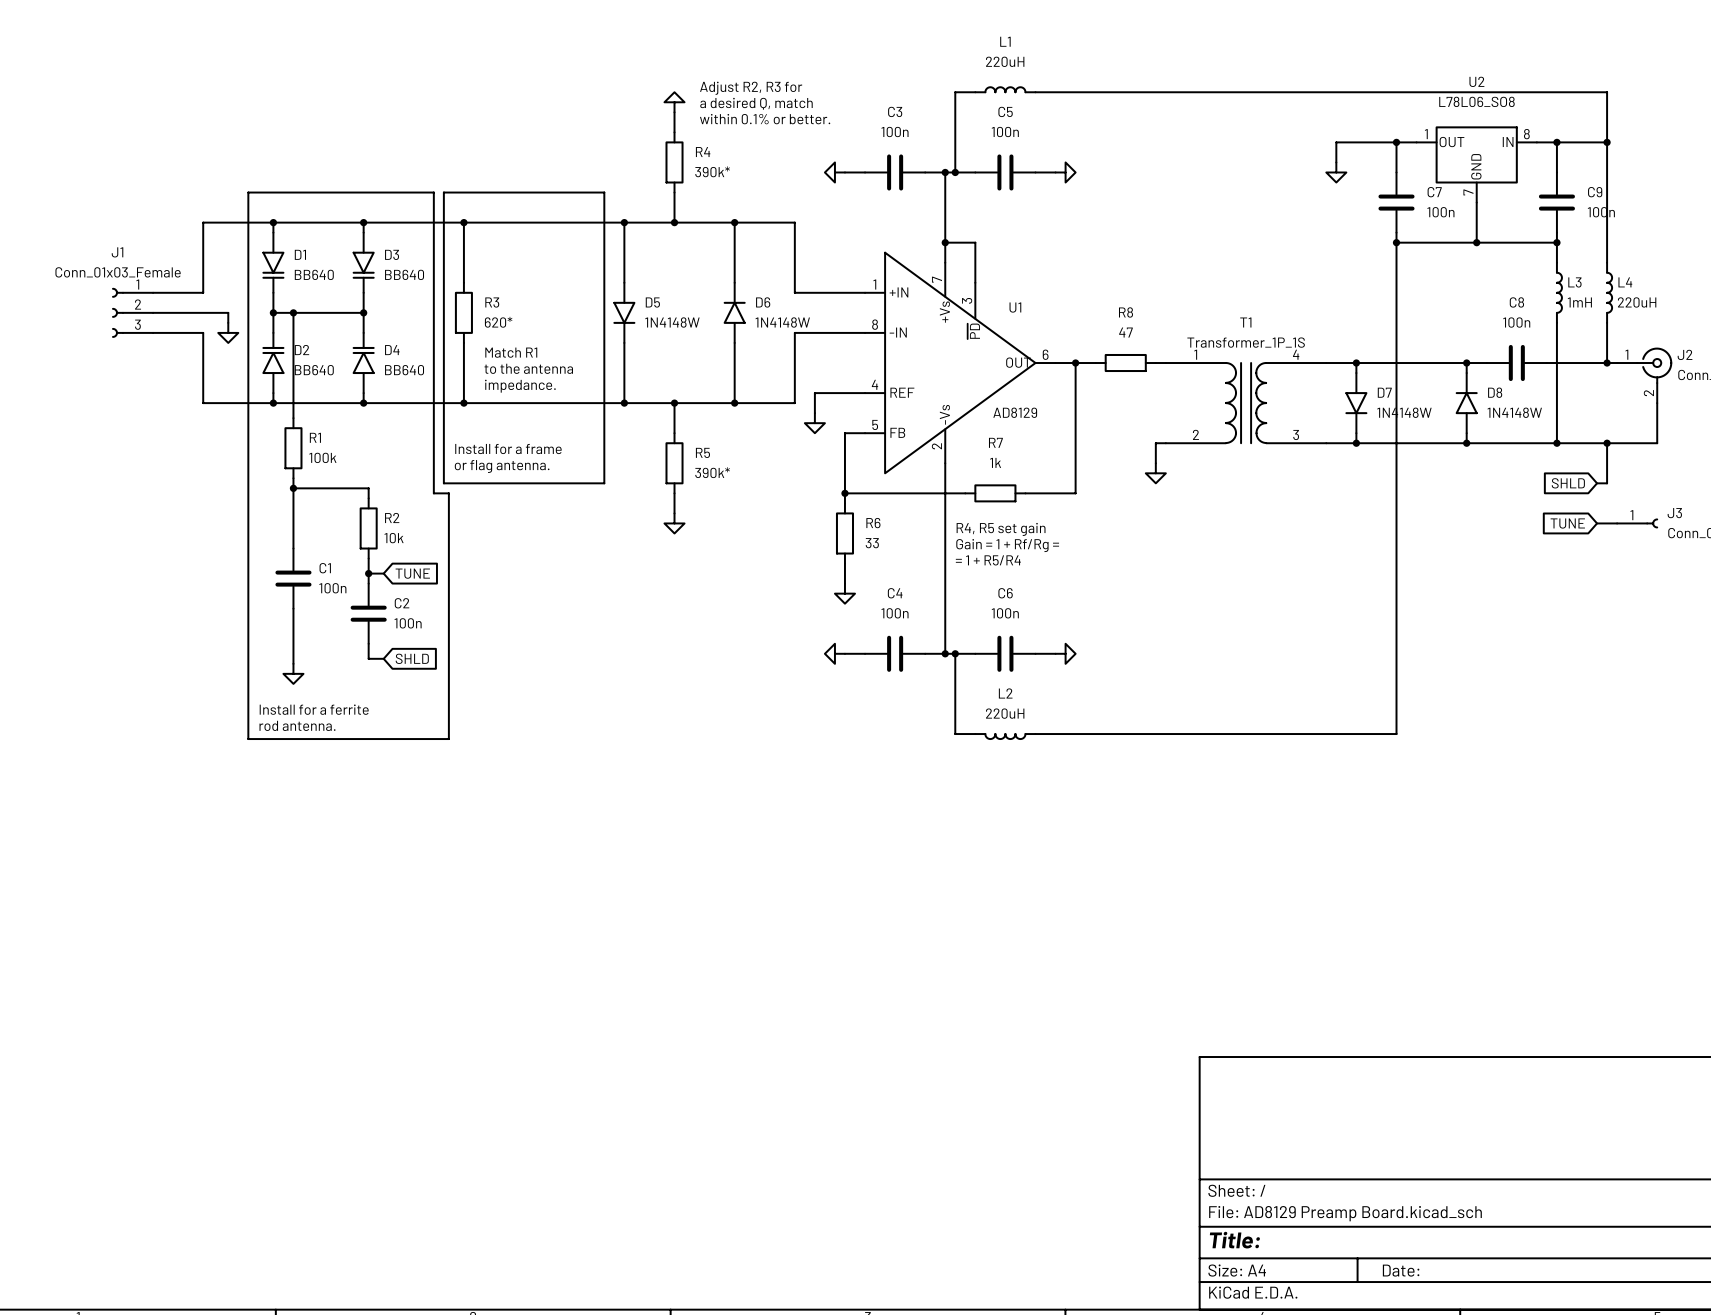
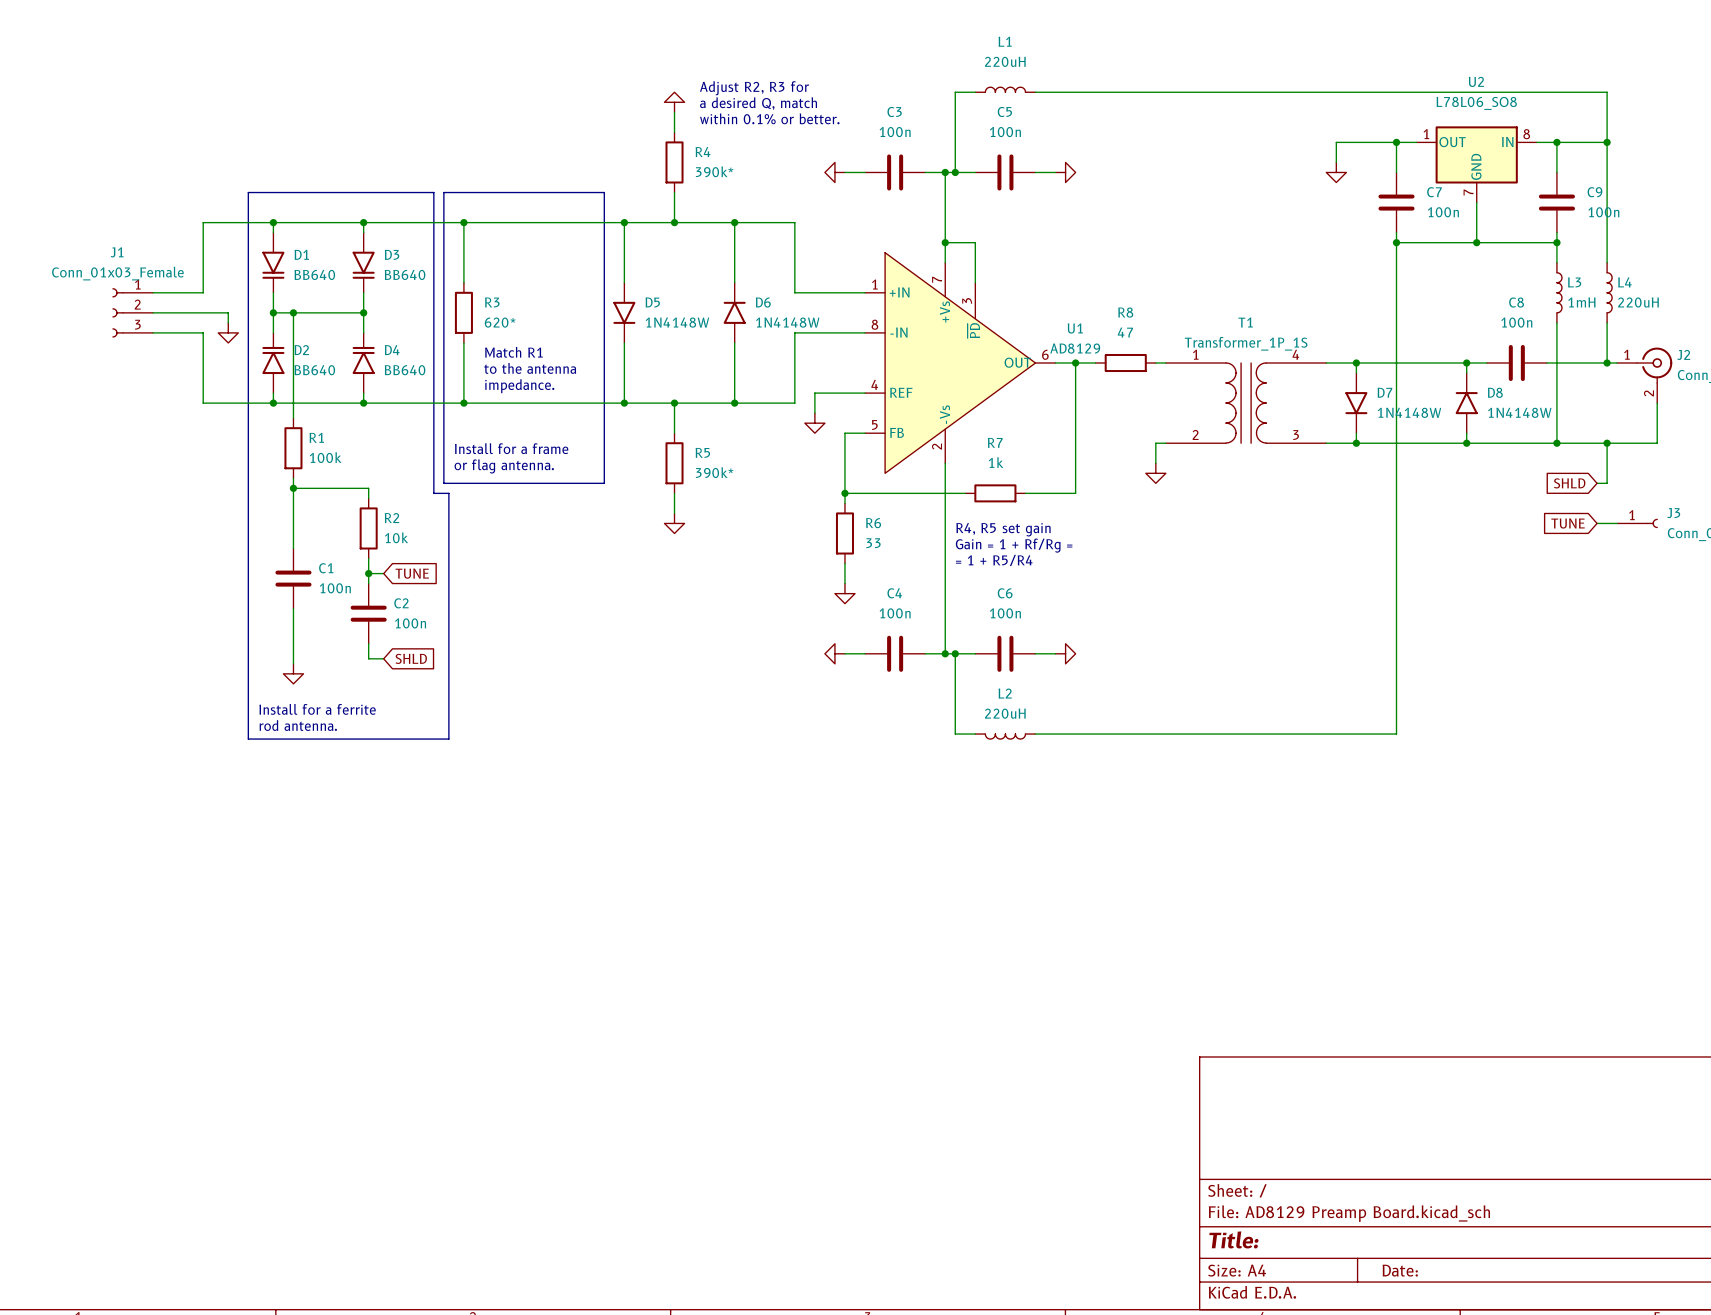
U1 name position: U1 (1015, 307) -> U1 (1075, 328)
U1 value position: AD8129 (1015, 412) -> AD8129 (1075, 348)

